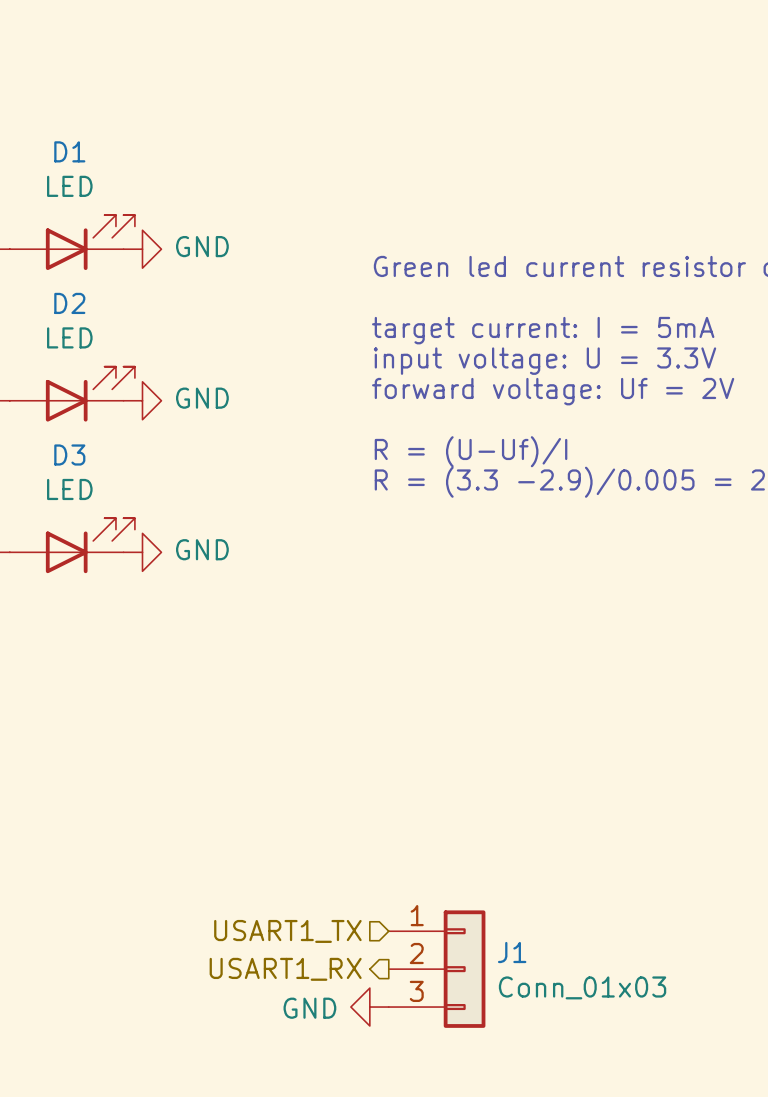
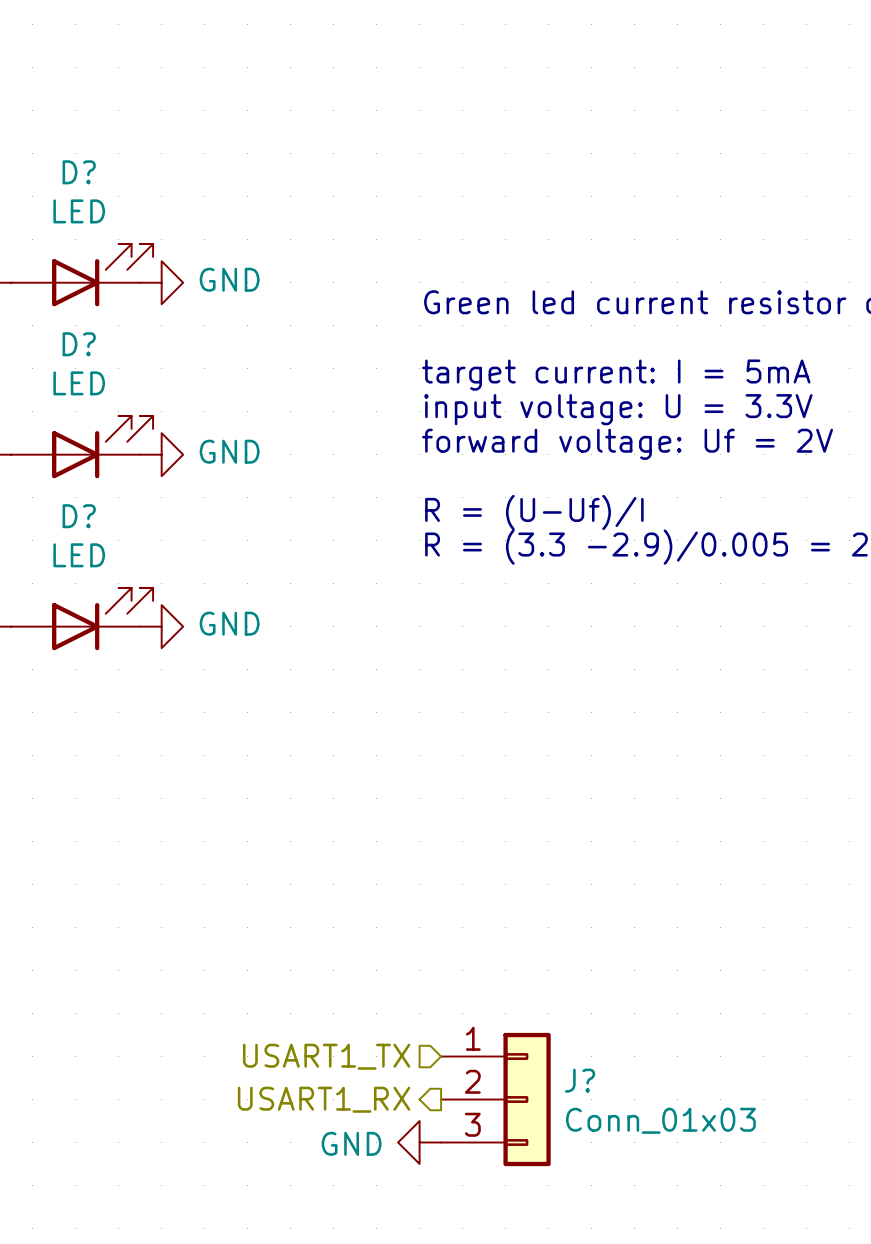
D1 name: D1 (69, 151) -> D? (79, 172)
D2 name: D2 (69, 303) -> D? (79, 344)
D3 name: D3 (69, 454) -> D? (79, 516)
J1 name: J1 (512, 952) -> J? (580, 1080)

